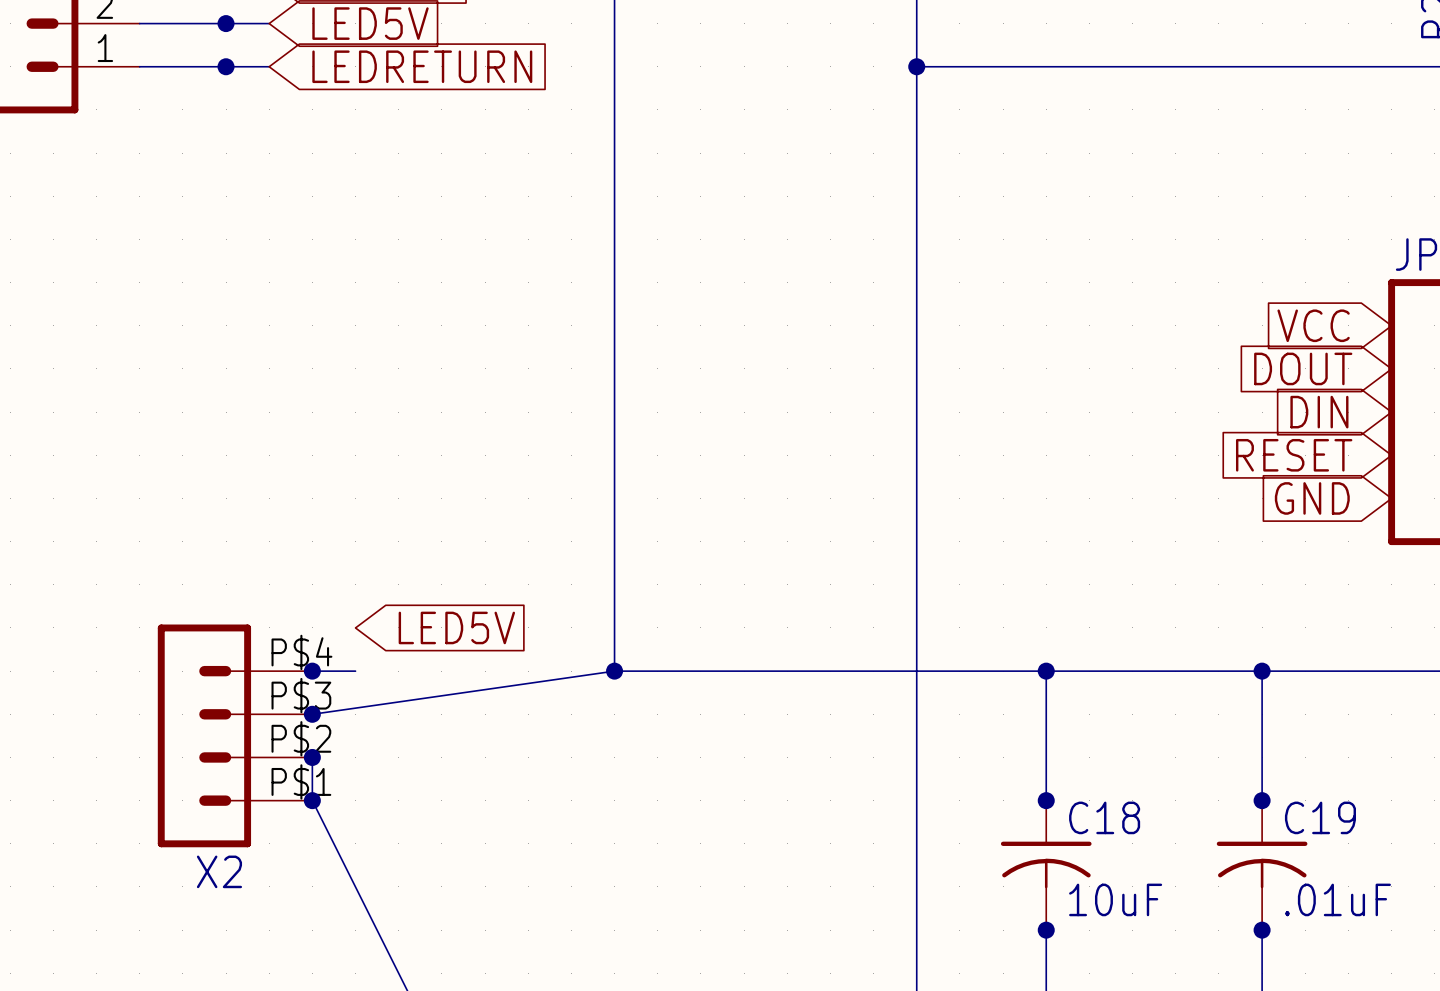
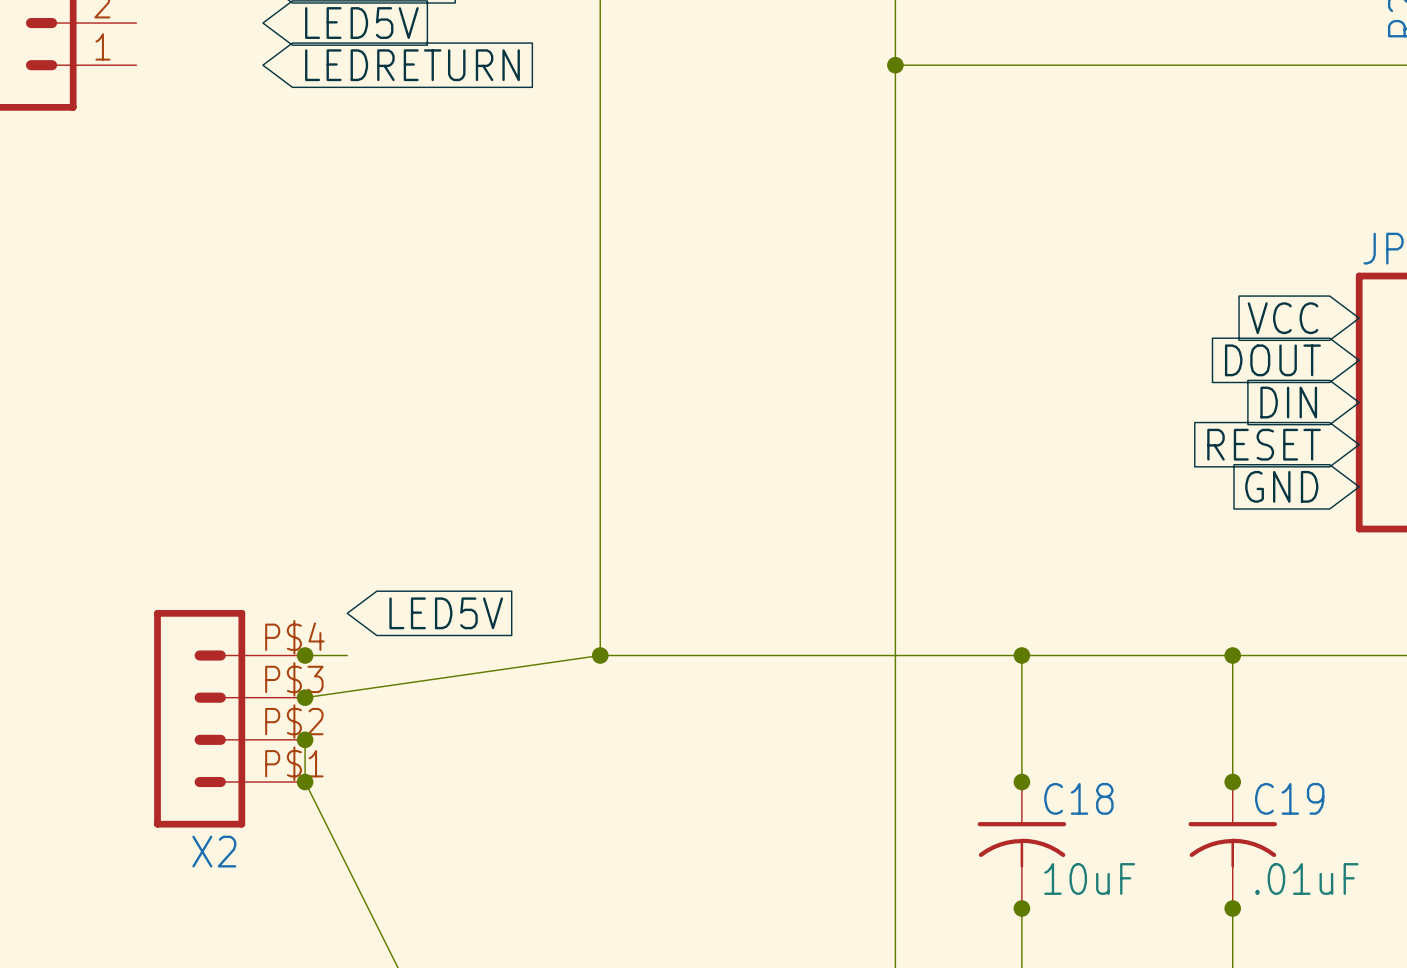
wire: (139, 23) (269, 23) -> none
junction: (226, 23) -> none
wire: (139, 66) (269, 66) -> none
junction: (226, 66) -> none

